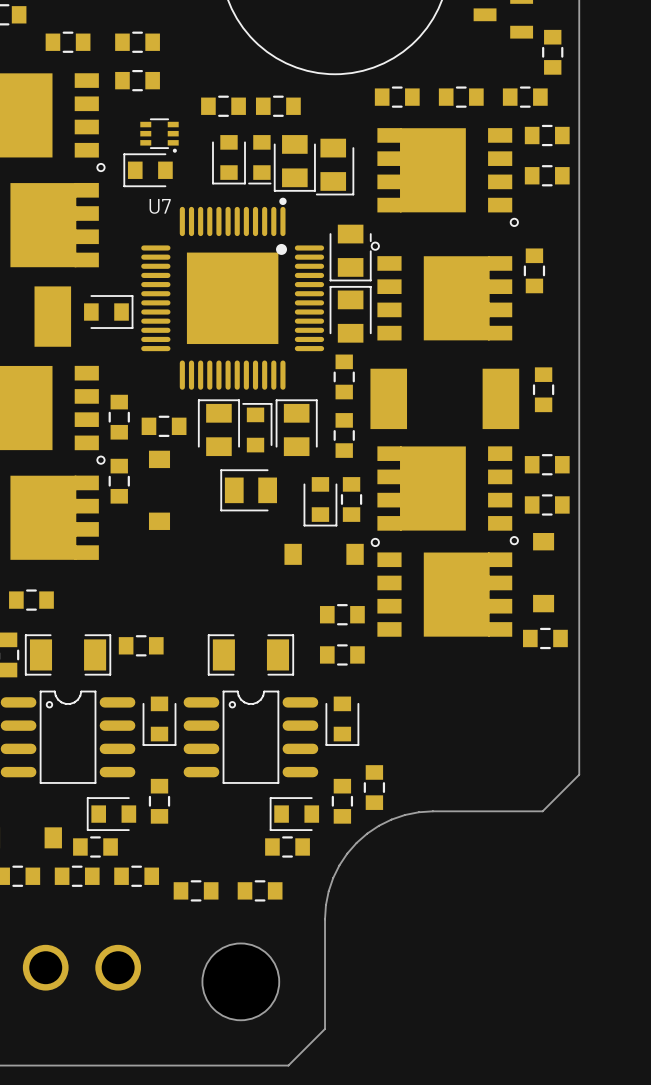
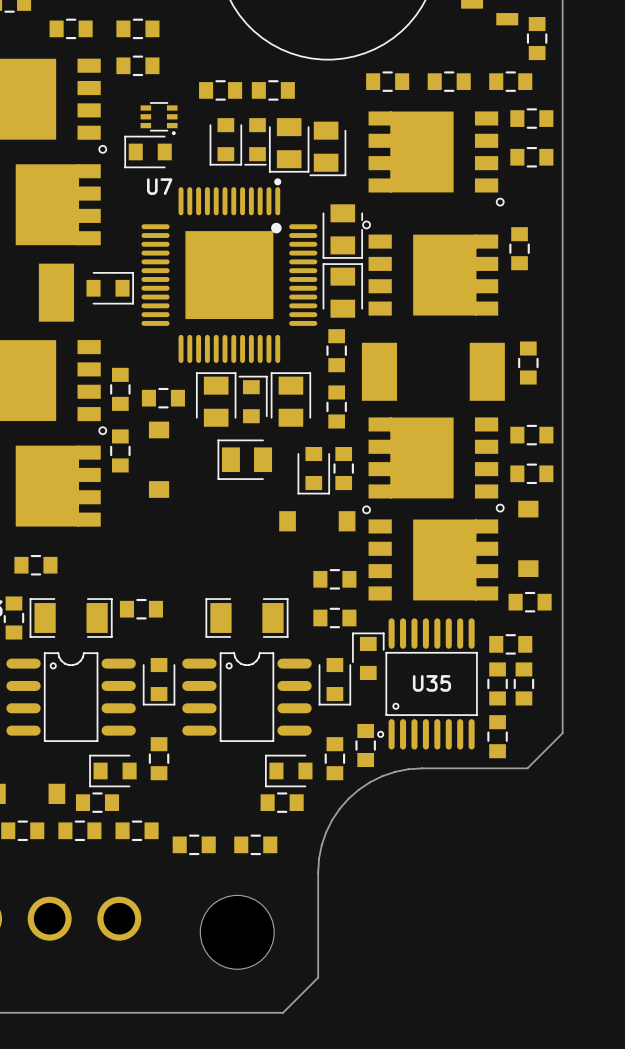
part: none -> (510, 644)
part: none -> (368, 656)
part: none -> (427, 683)
text: none -> U35 (431, 683)
part: none -> (497, 683)
part: none -> (523, 683)
part: none -> (497, 736)

